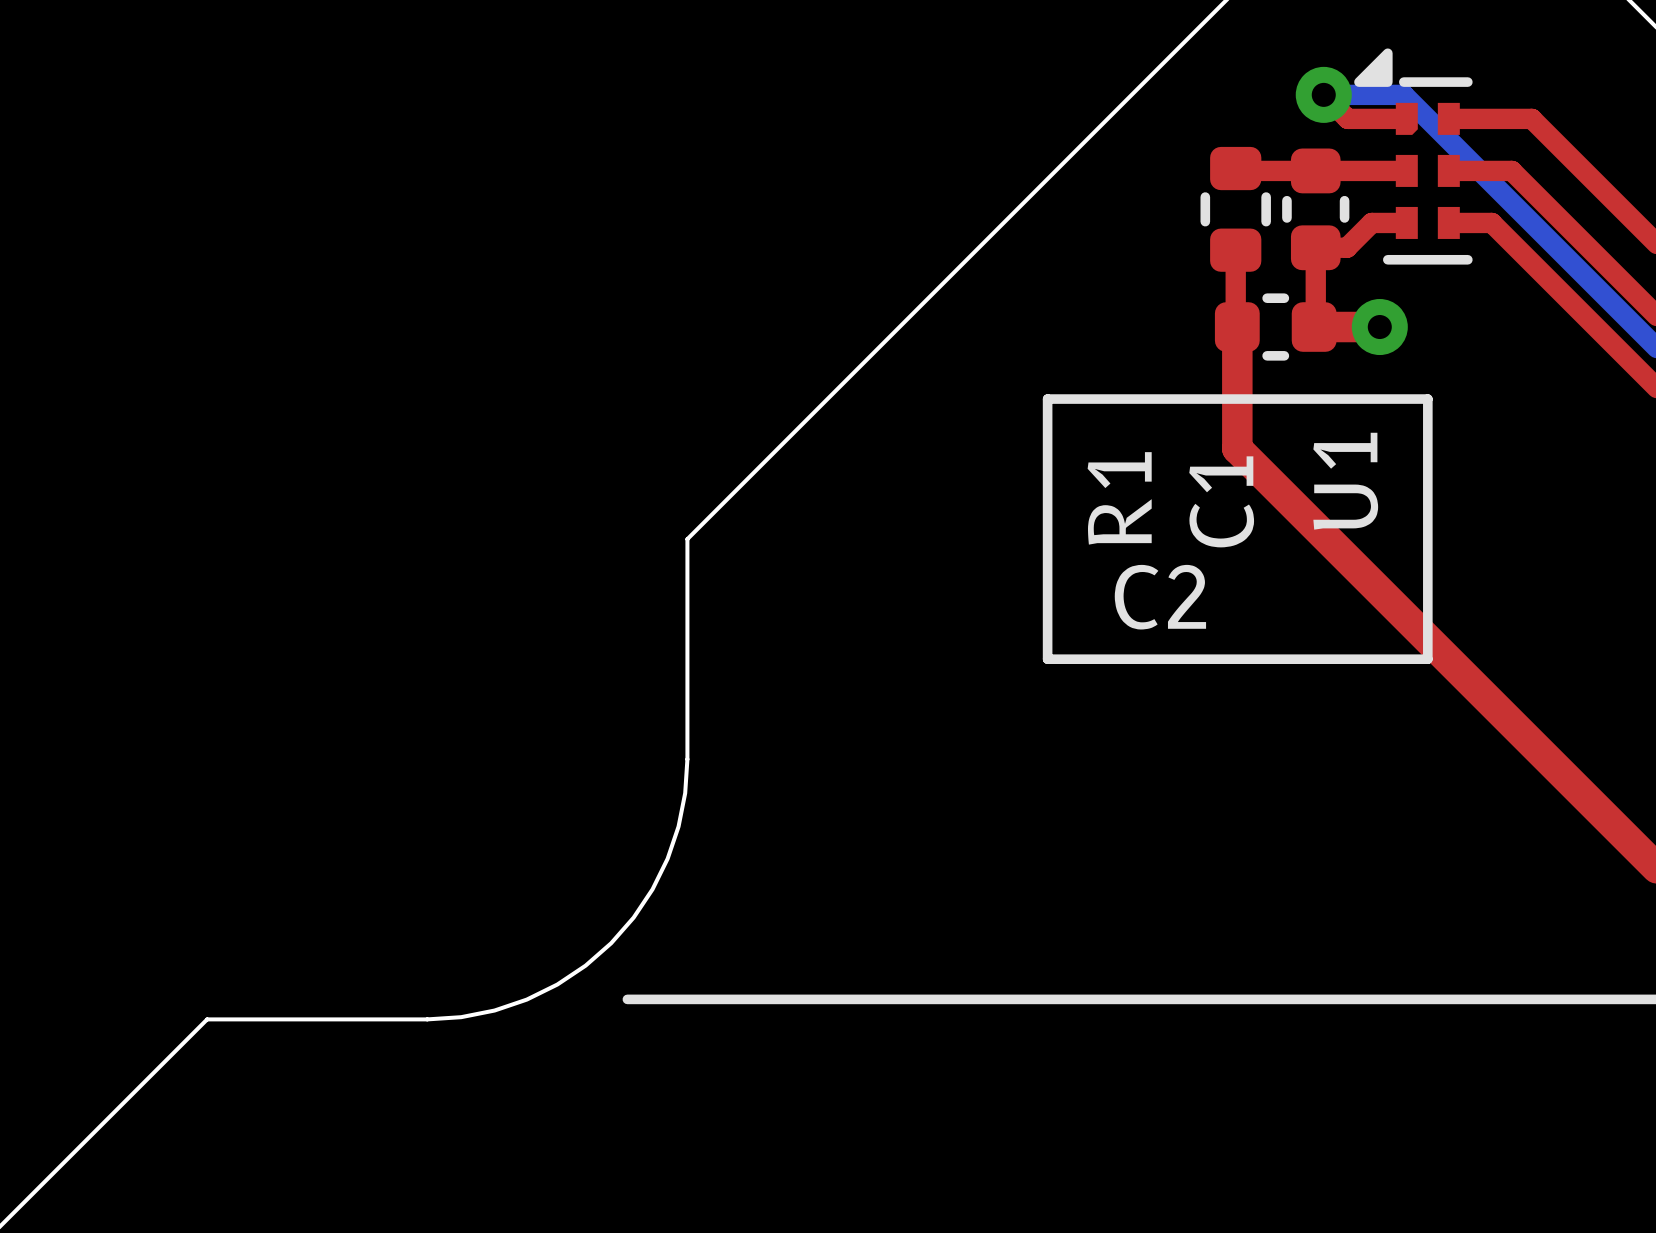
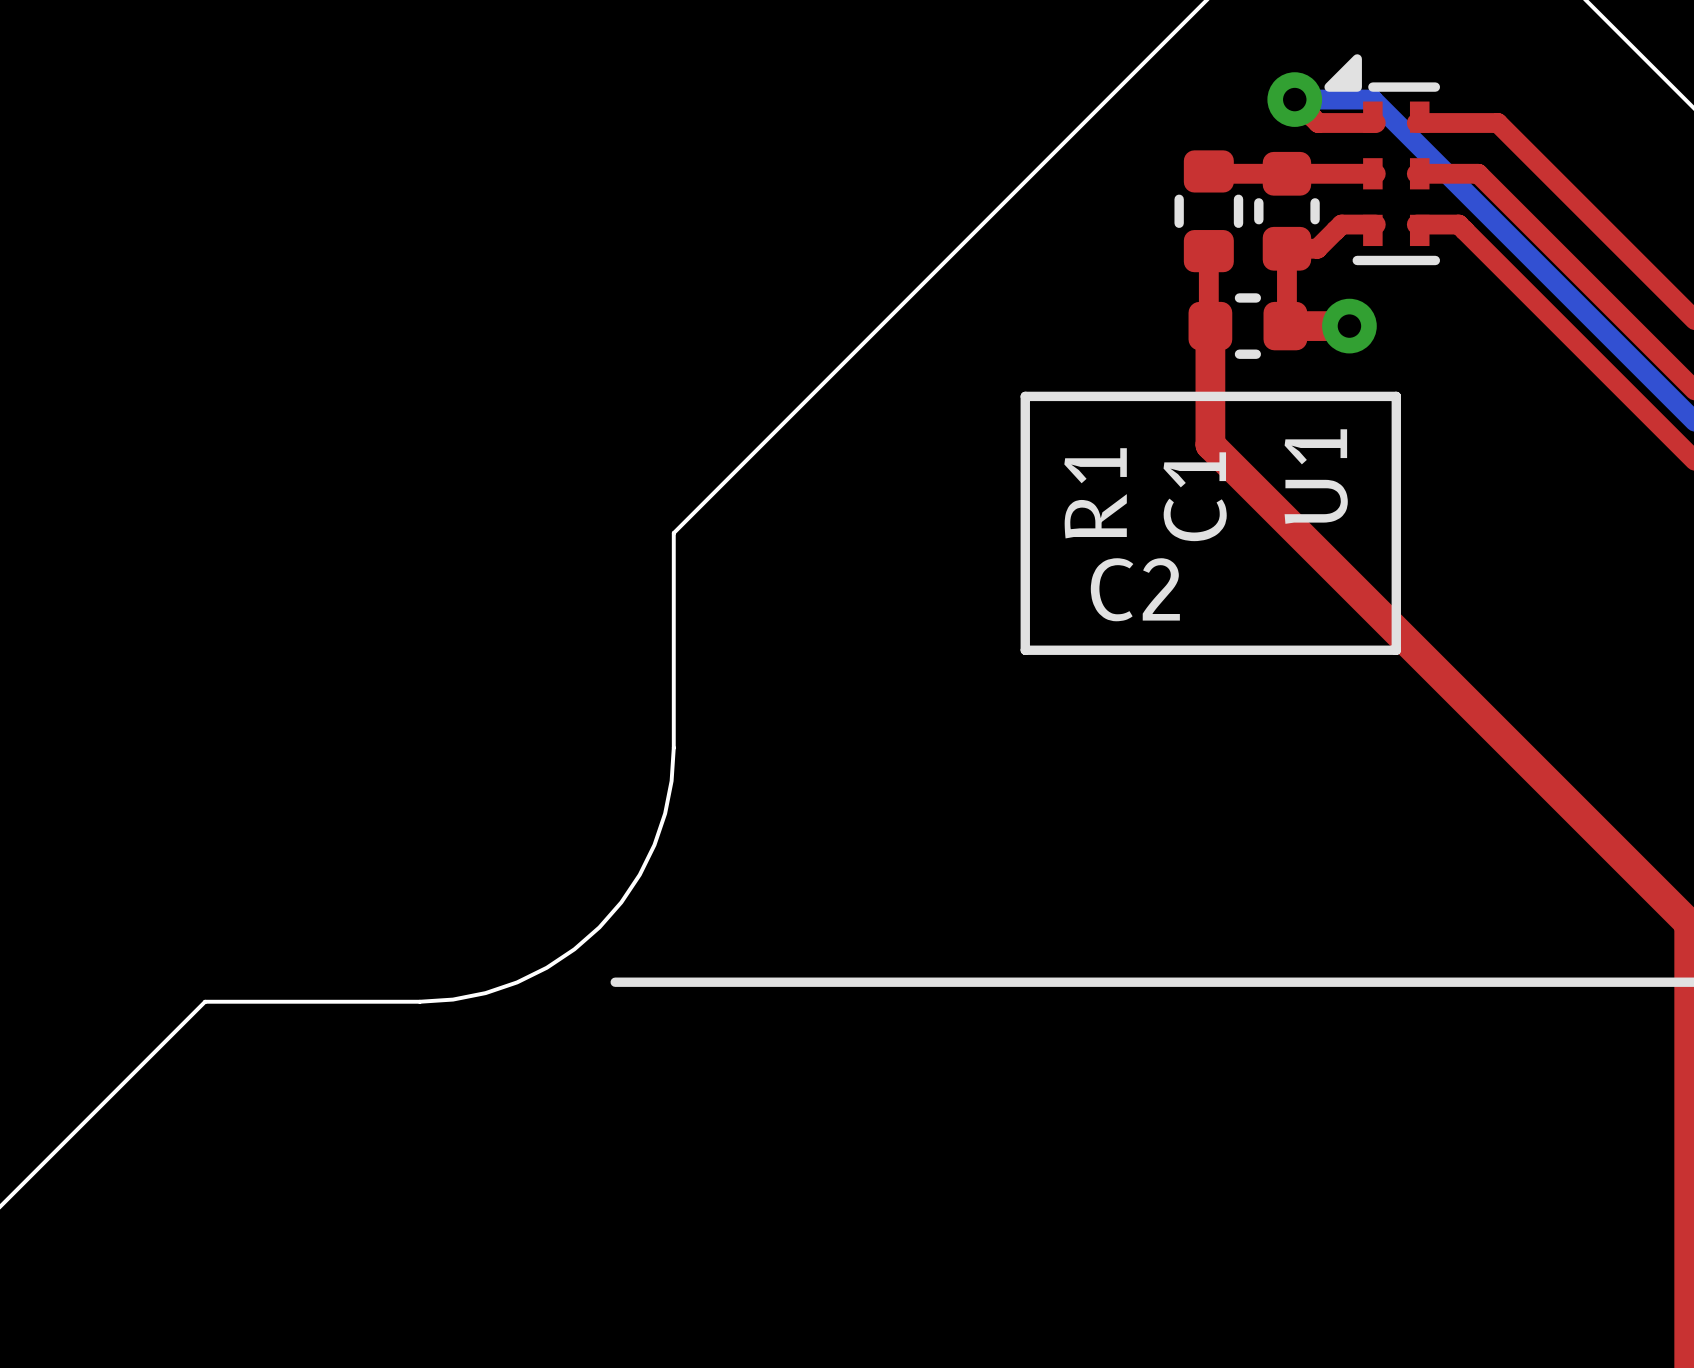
U1 footprint: [1354, 48, 1473, 265] -> [1324, 54, 1441, 266]

